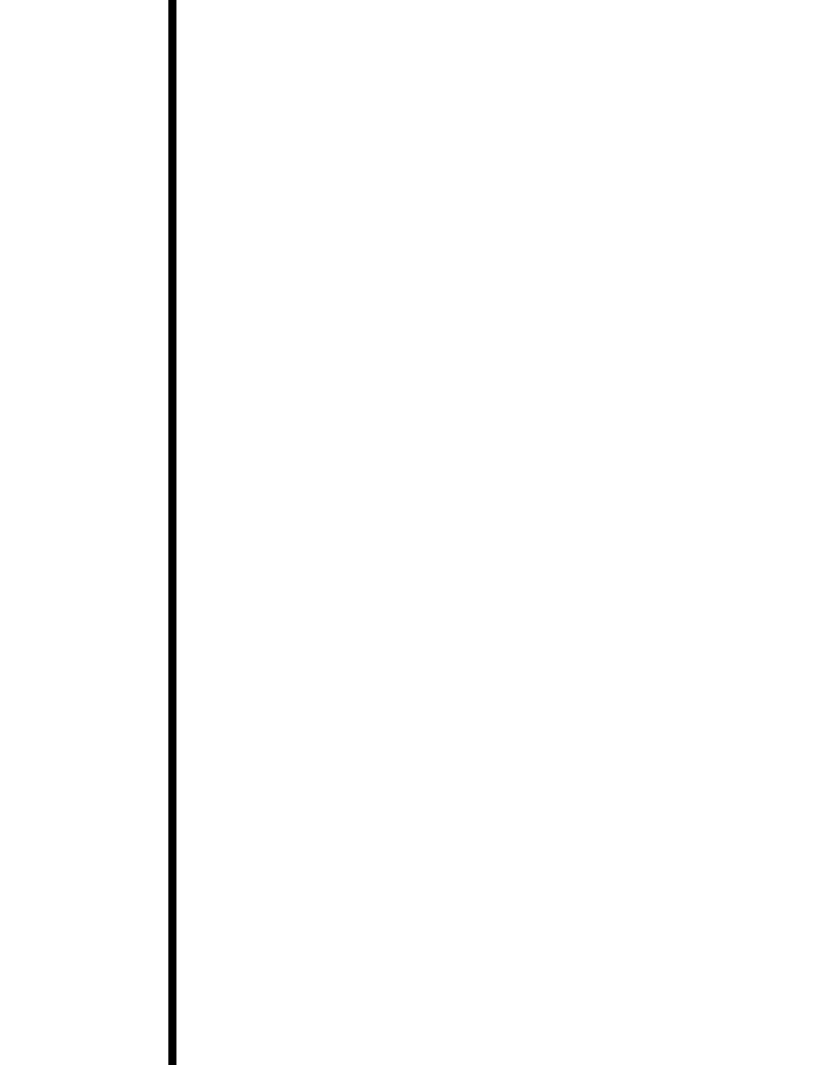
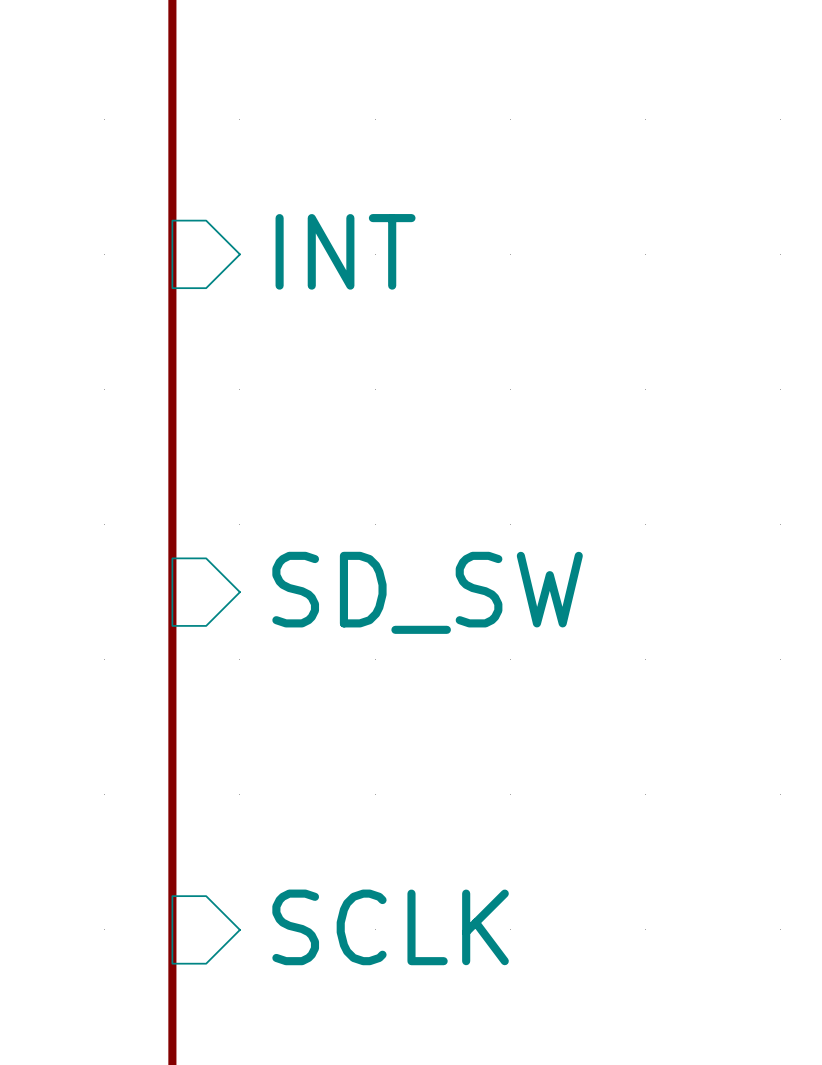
sheet pin: none -> INT (345, 251)
sheet pin: none -> SD_SW (427, 592)
sheet pin: none -> SCLK (390, 927)

